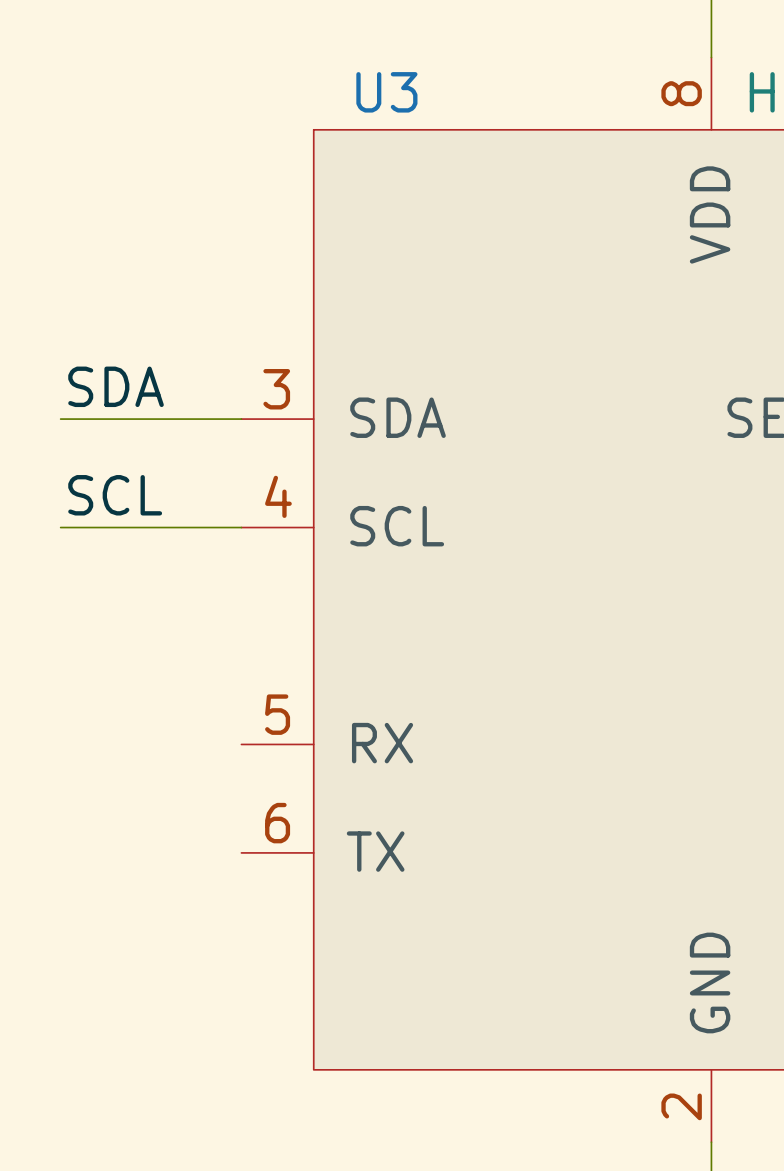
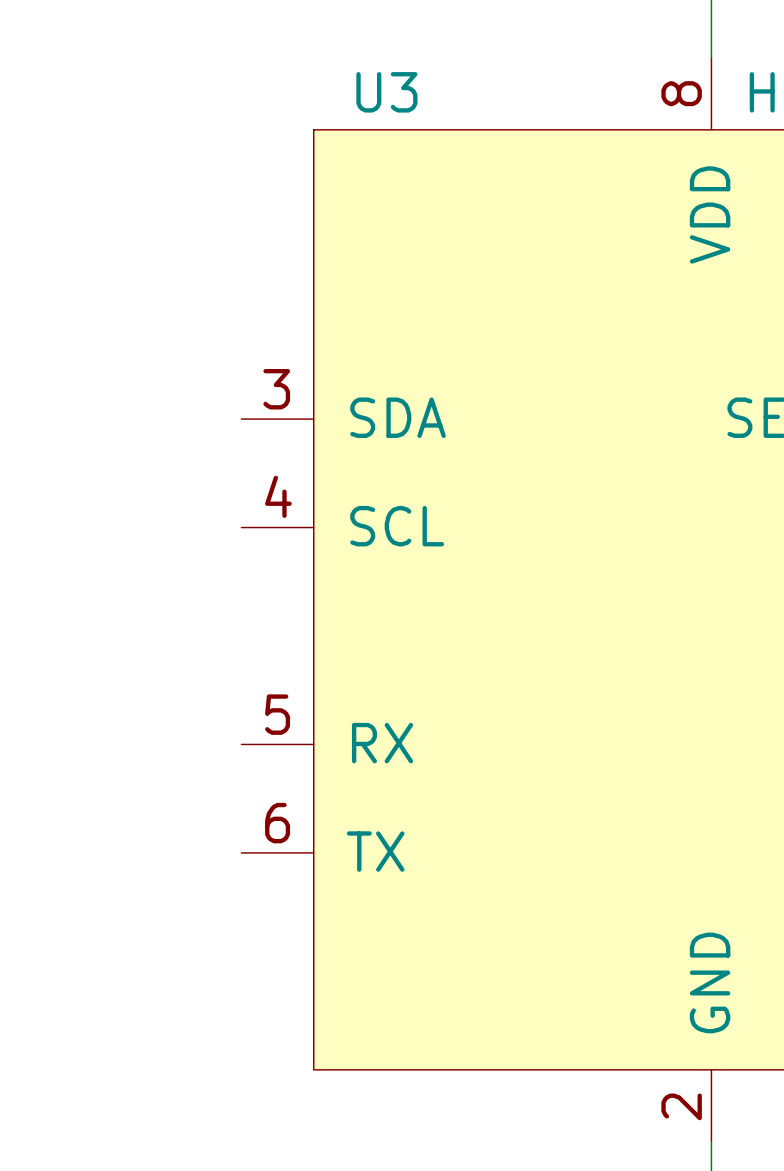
label: SDA (116, 386) -> none
wire: (60, 419) (241, 419) -> none
label: SCL (115, 495) -> none
wire: (60, 527) (241, 527) -> none

